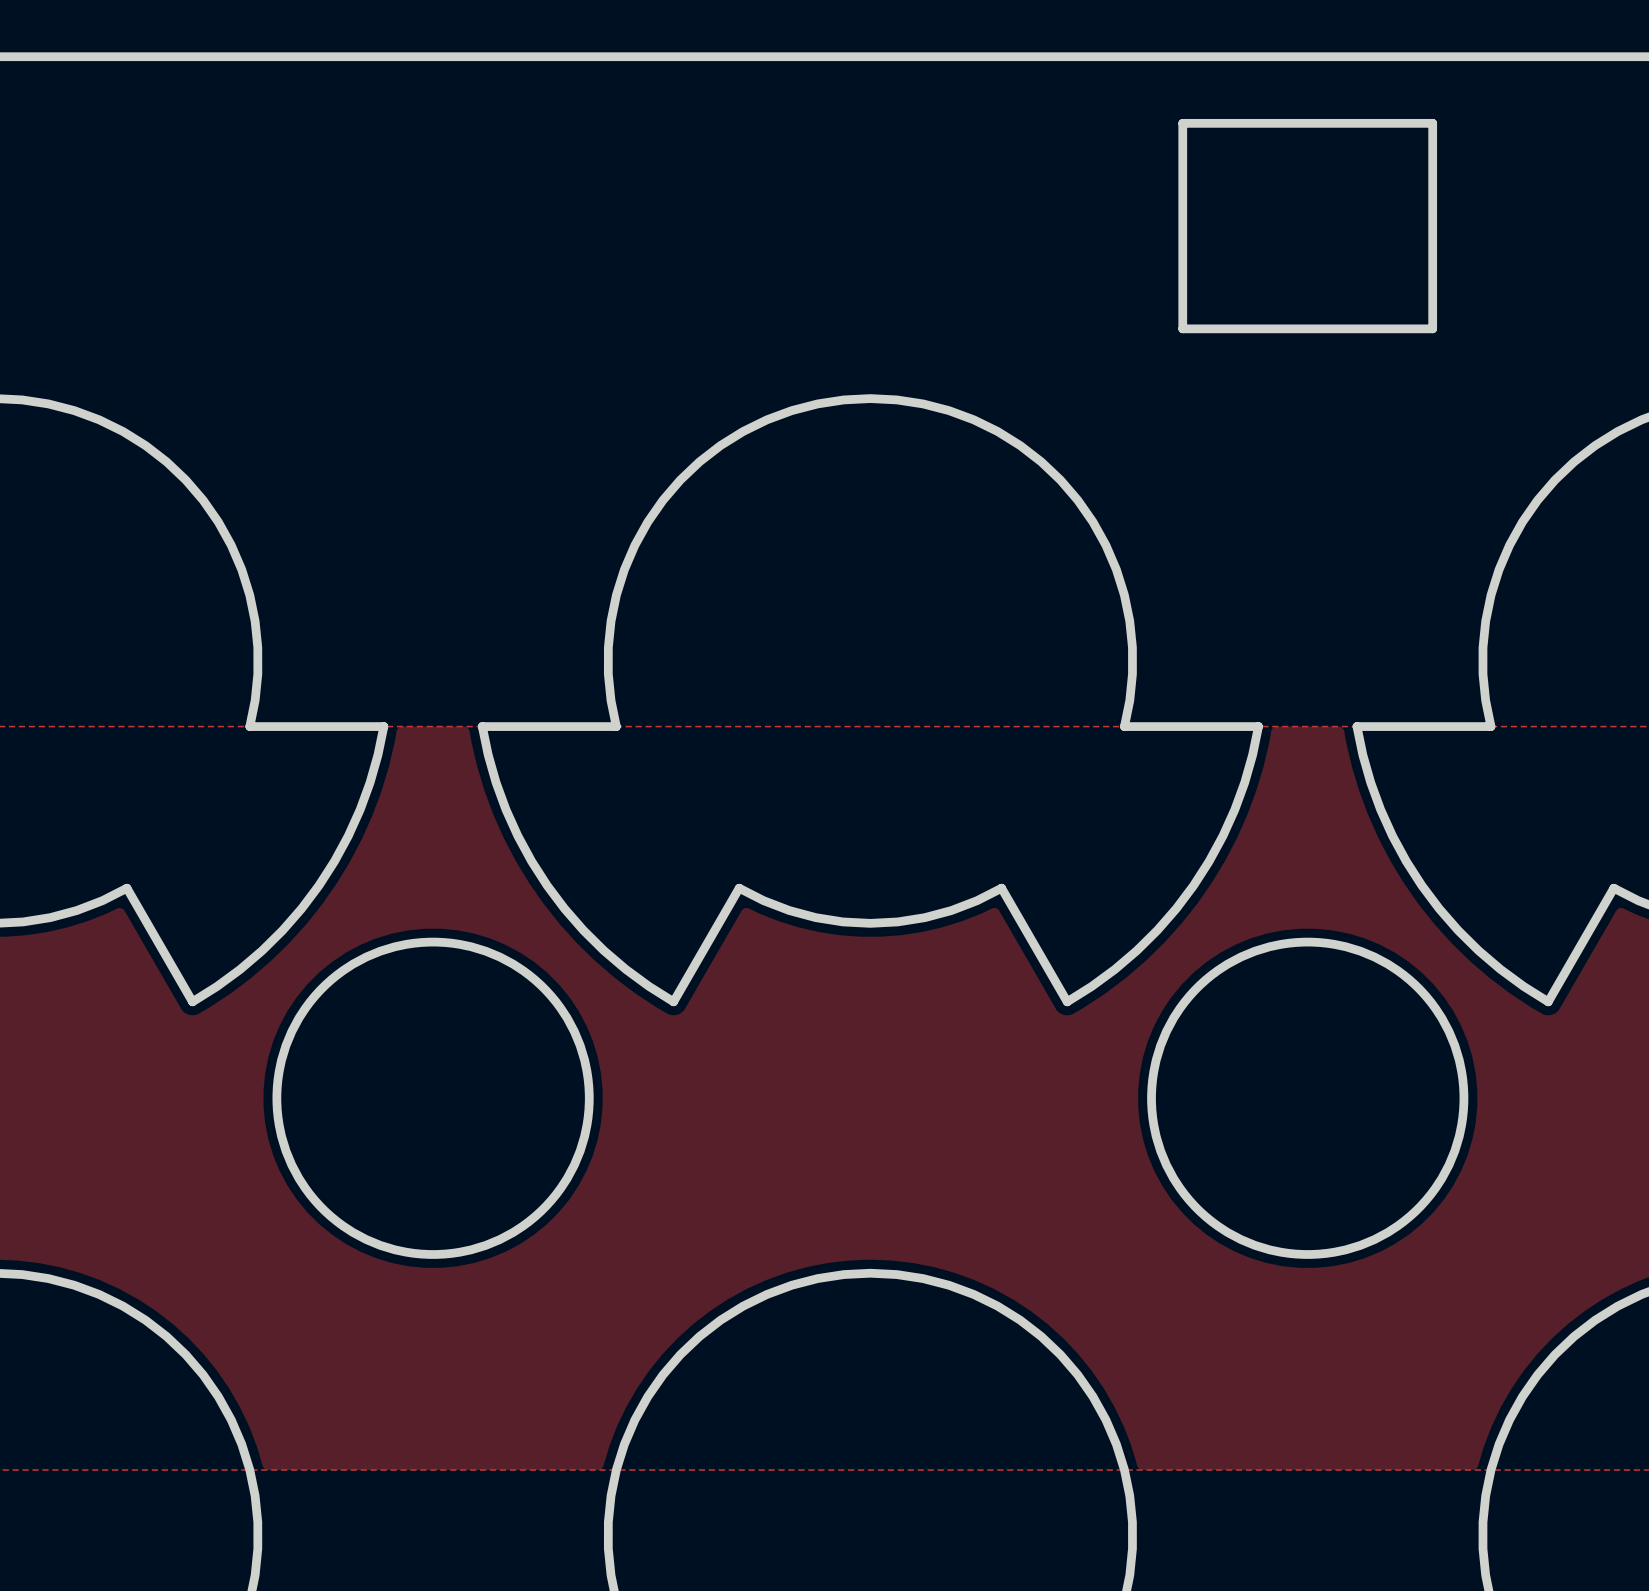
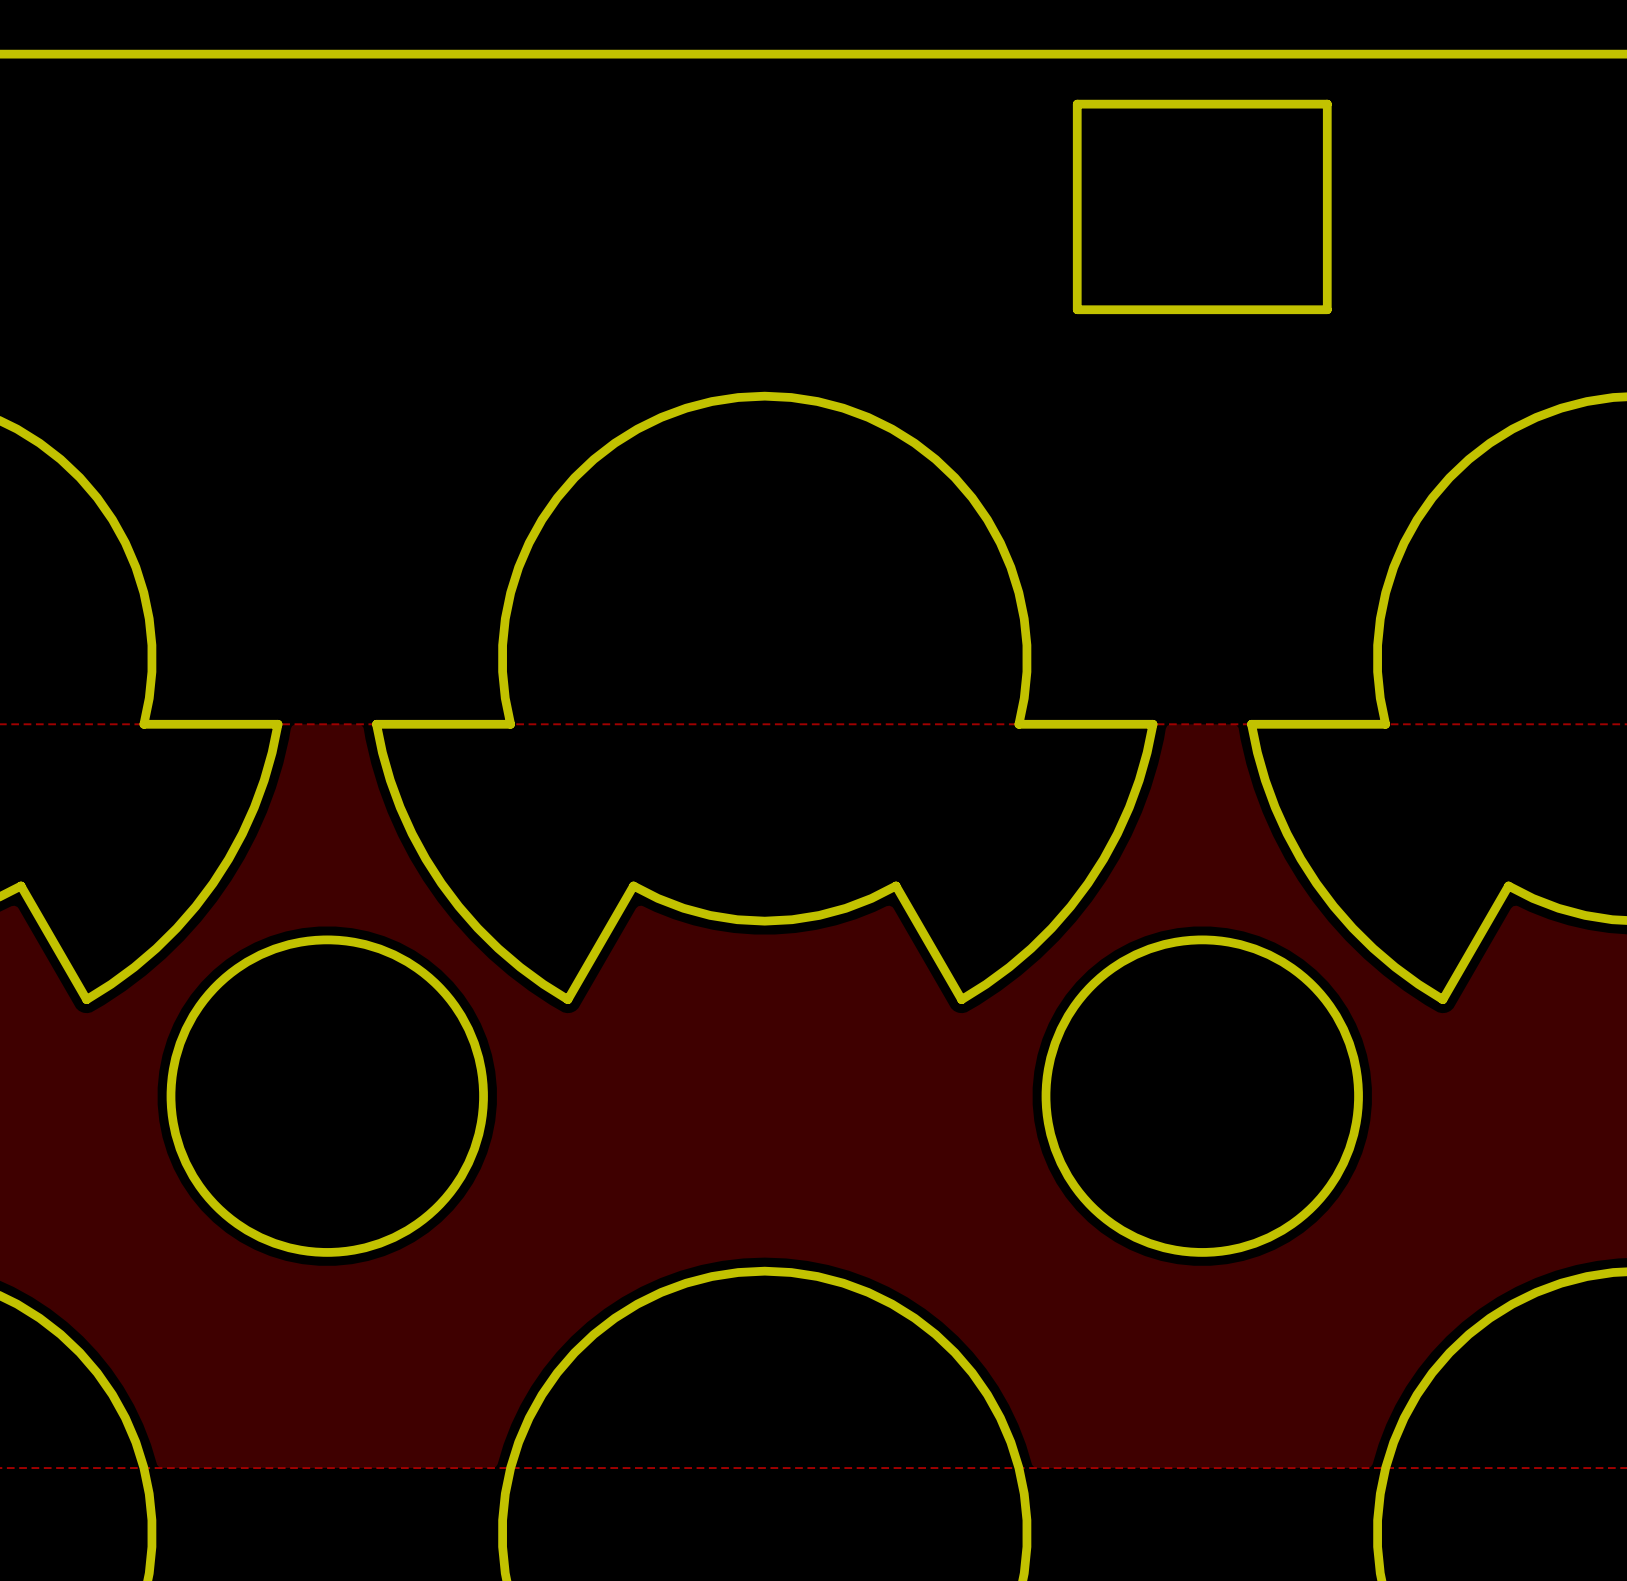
board edge: (1182, 123) (1432, 123) -> (1077, 120) (1077, 104) (1327, 104) (1327, 120)
board edge: (1182, 312) (1182, 328) (1432, 328) (1432, 312) -> (1077, 309) (1327, 309)

